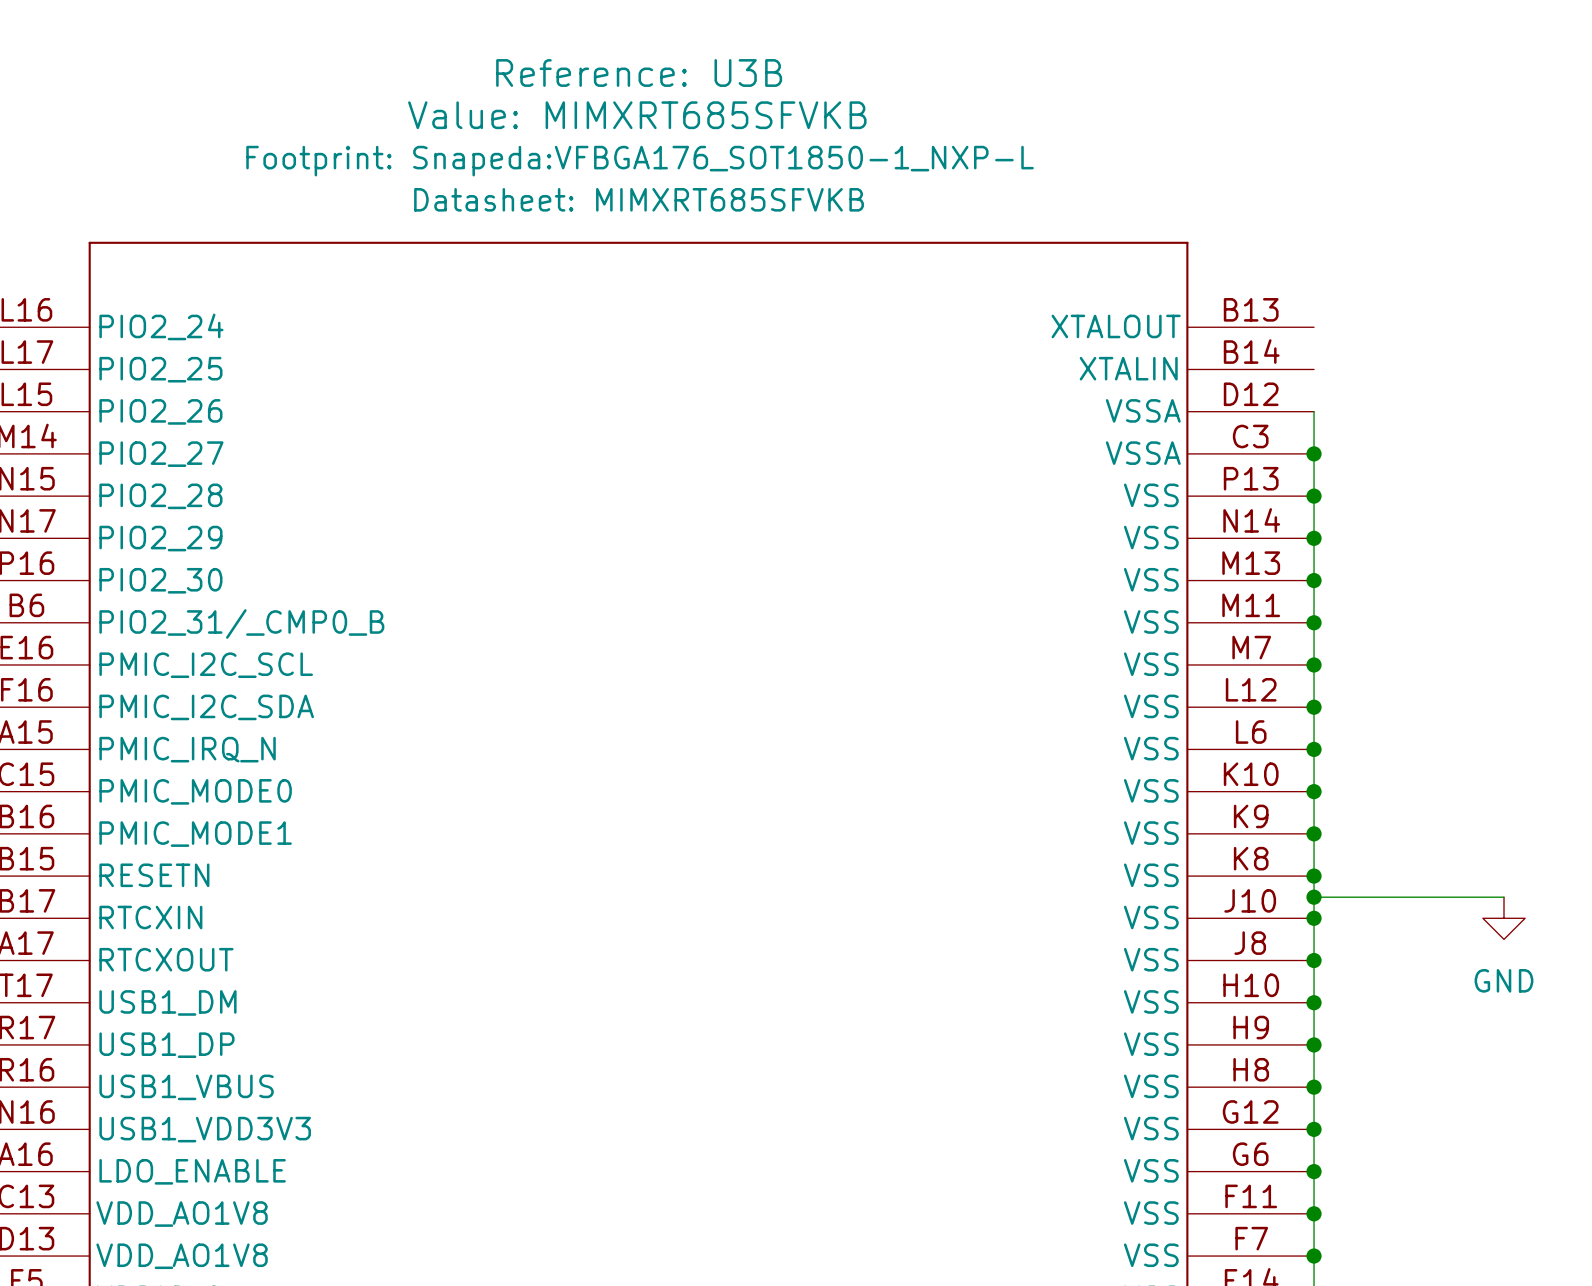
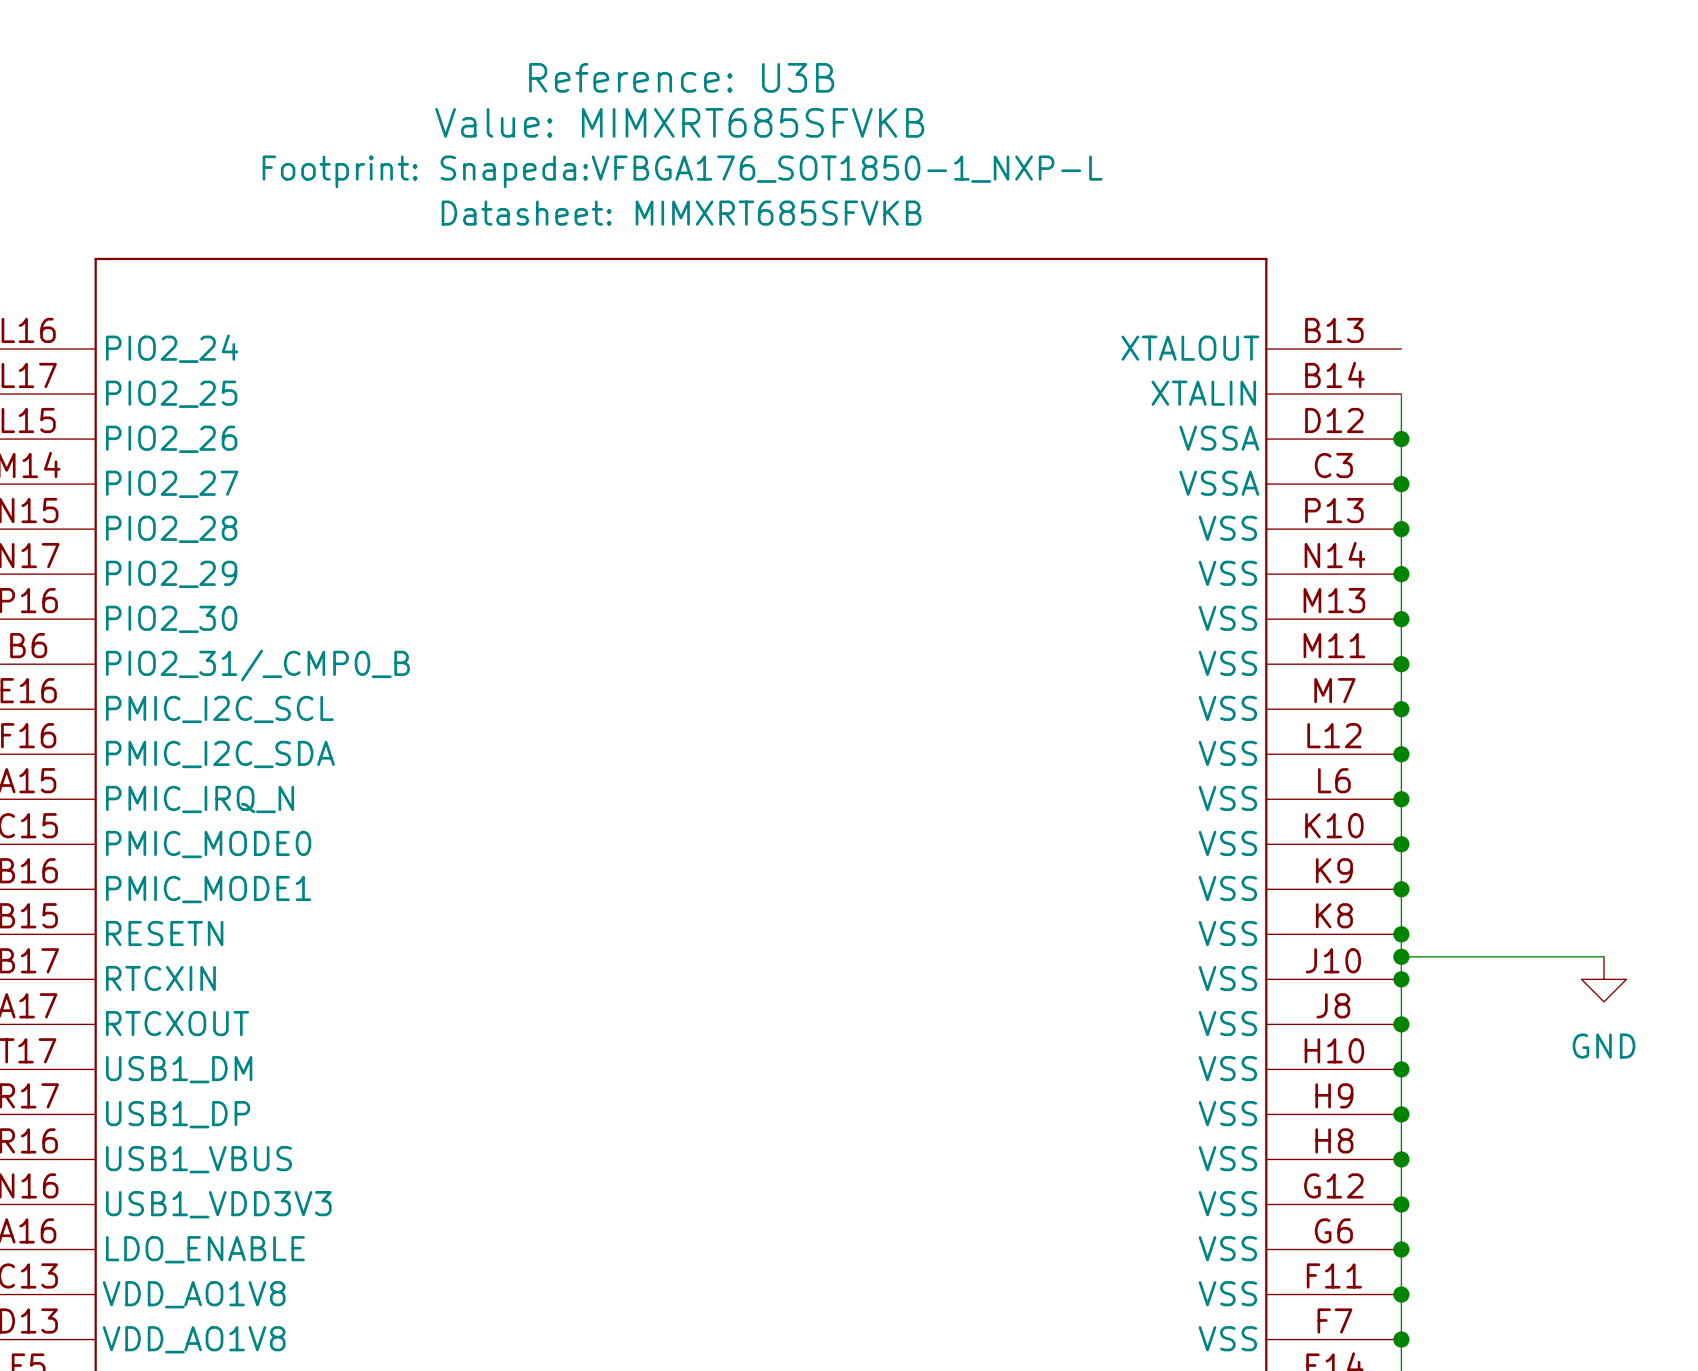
wire: none -> (1401, 394) (1401, 439)
junction: none -> (1401, 439)

